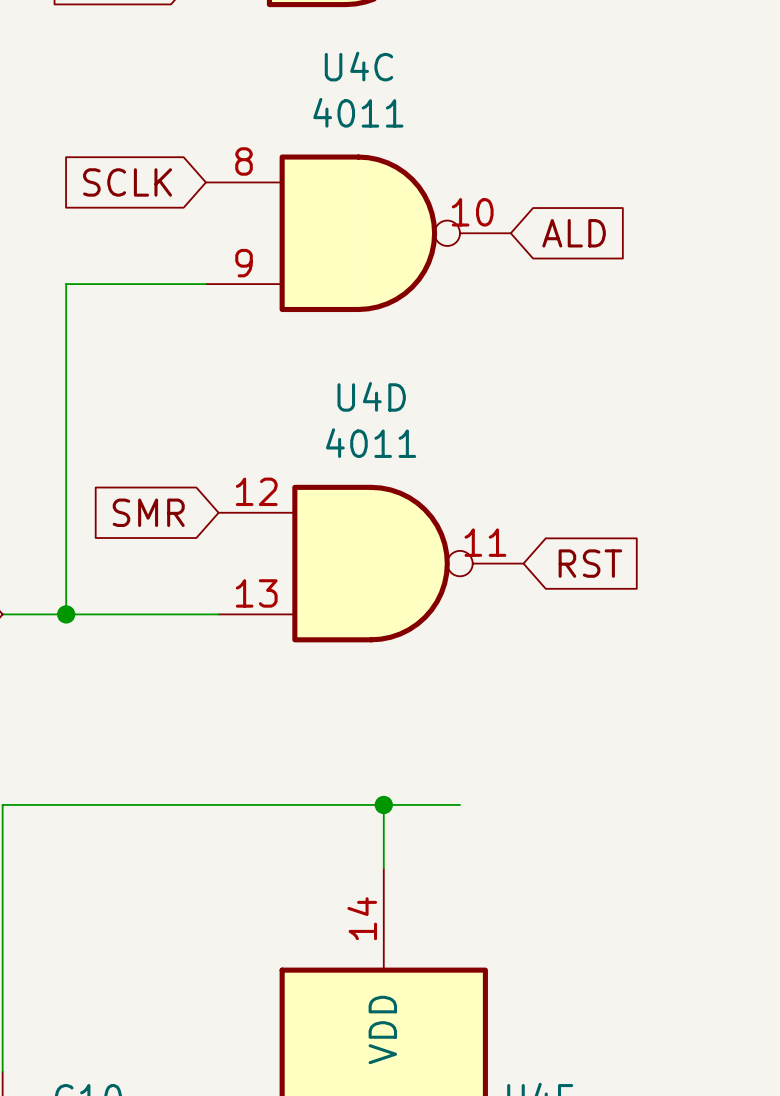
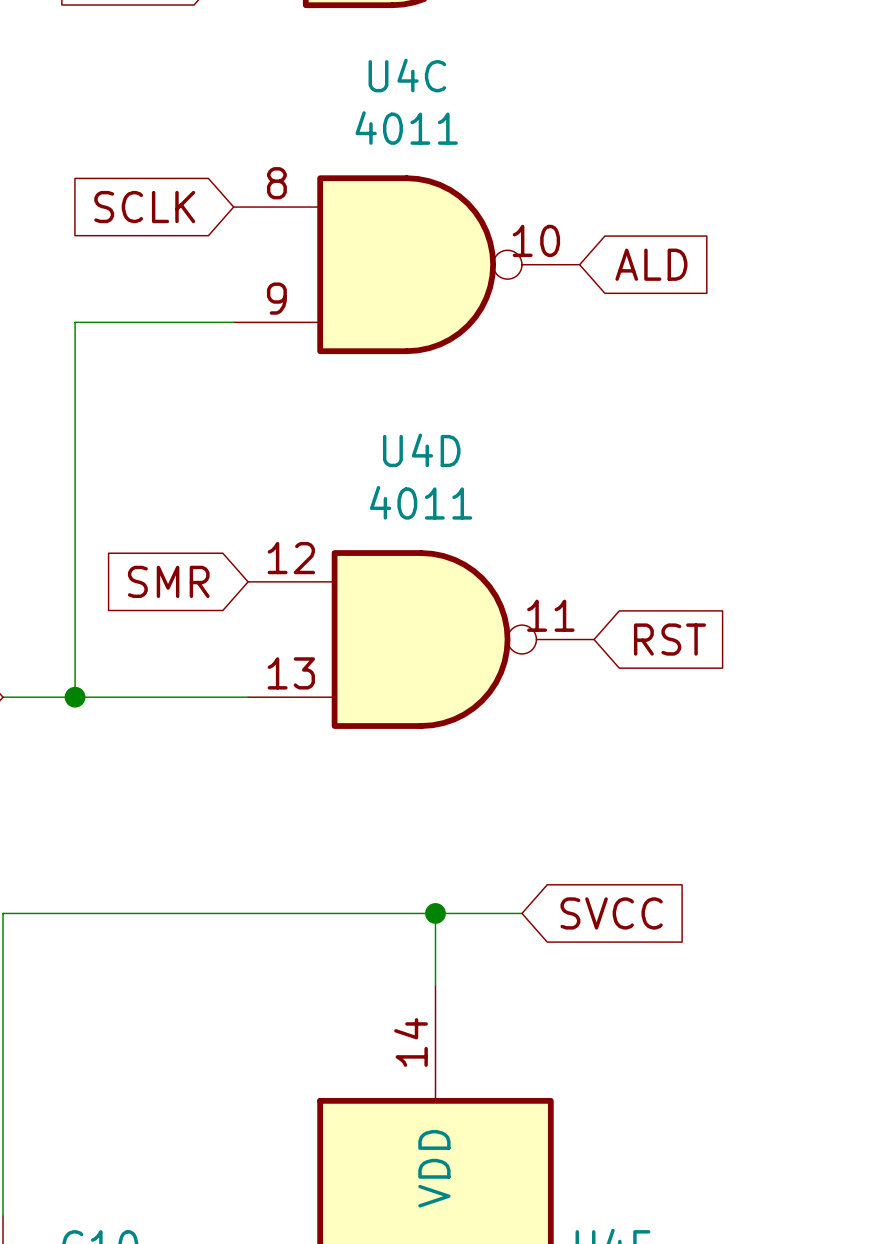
global label: none -> SVCC (611, 913)

